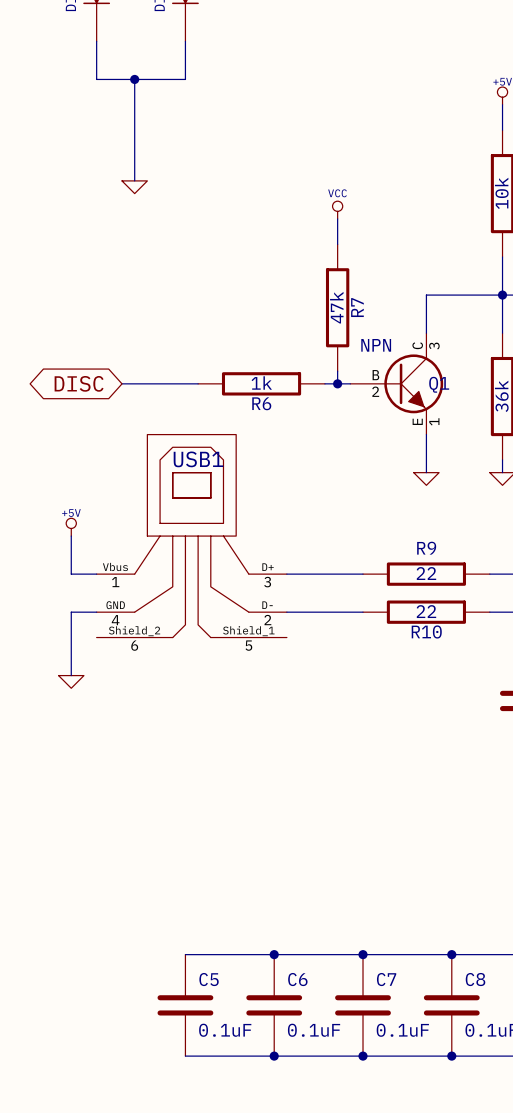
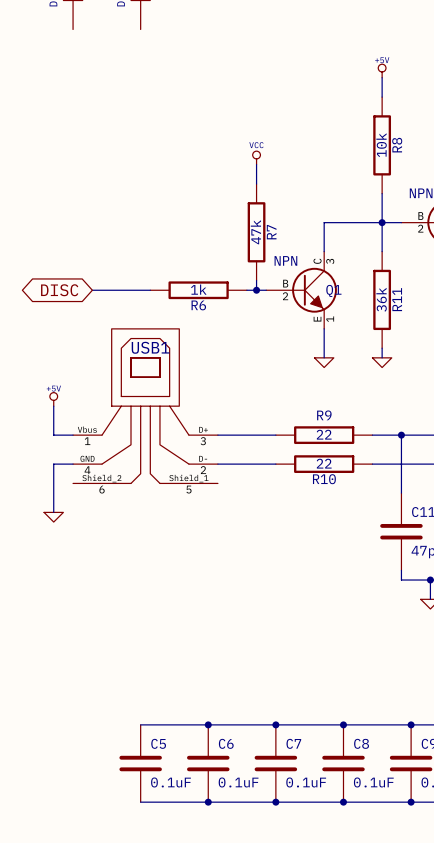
wire: (96, 41) (96, 79) (185, 79) (185, 41) -> none
wire: (134, 79) (134, 180) -> none
junction: (134, 79) -> none
power symbol: (134, 187) -> none

